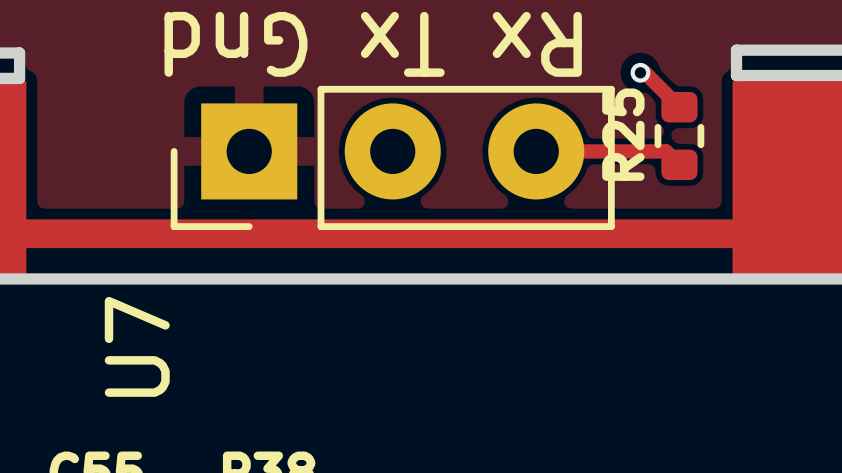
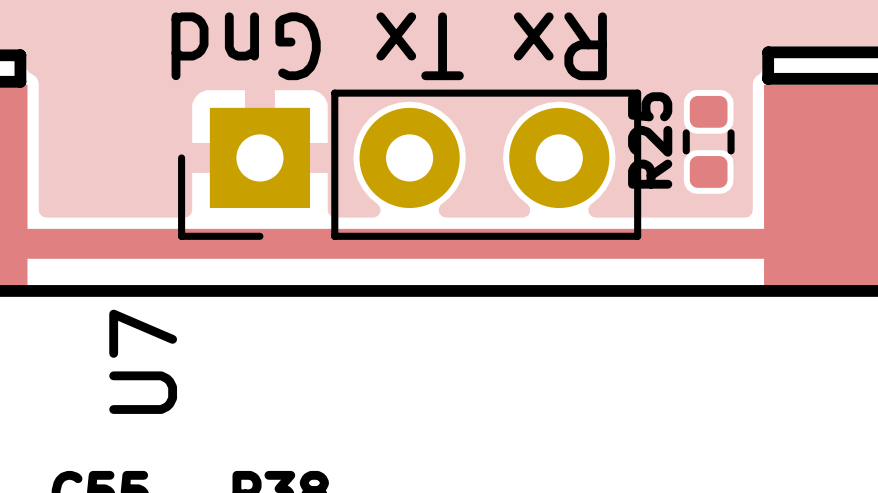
track: (640, 72) (644, 72) (679, 107) -> none
via: (640, 72) -> none
track: (536, 151) (666, 151) (679, 164) -> none

